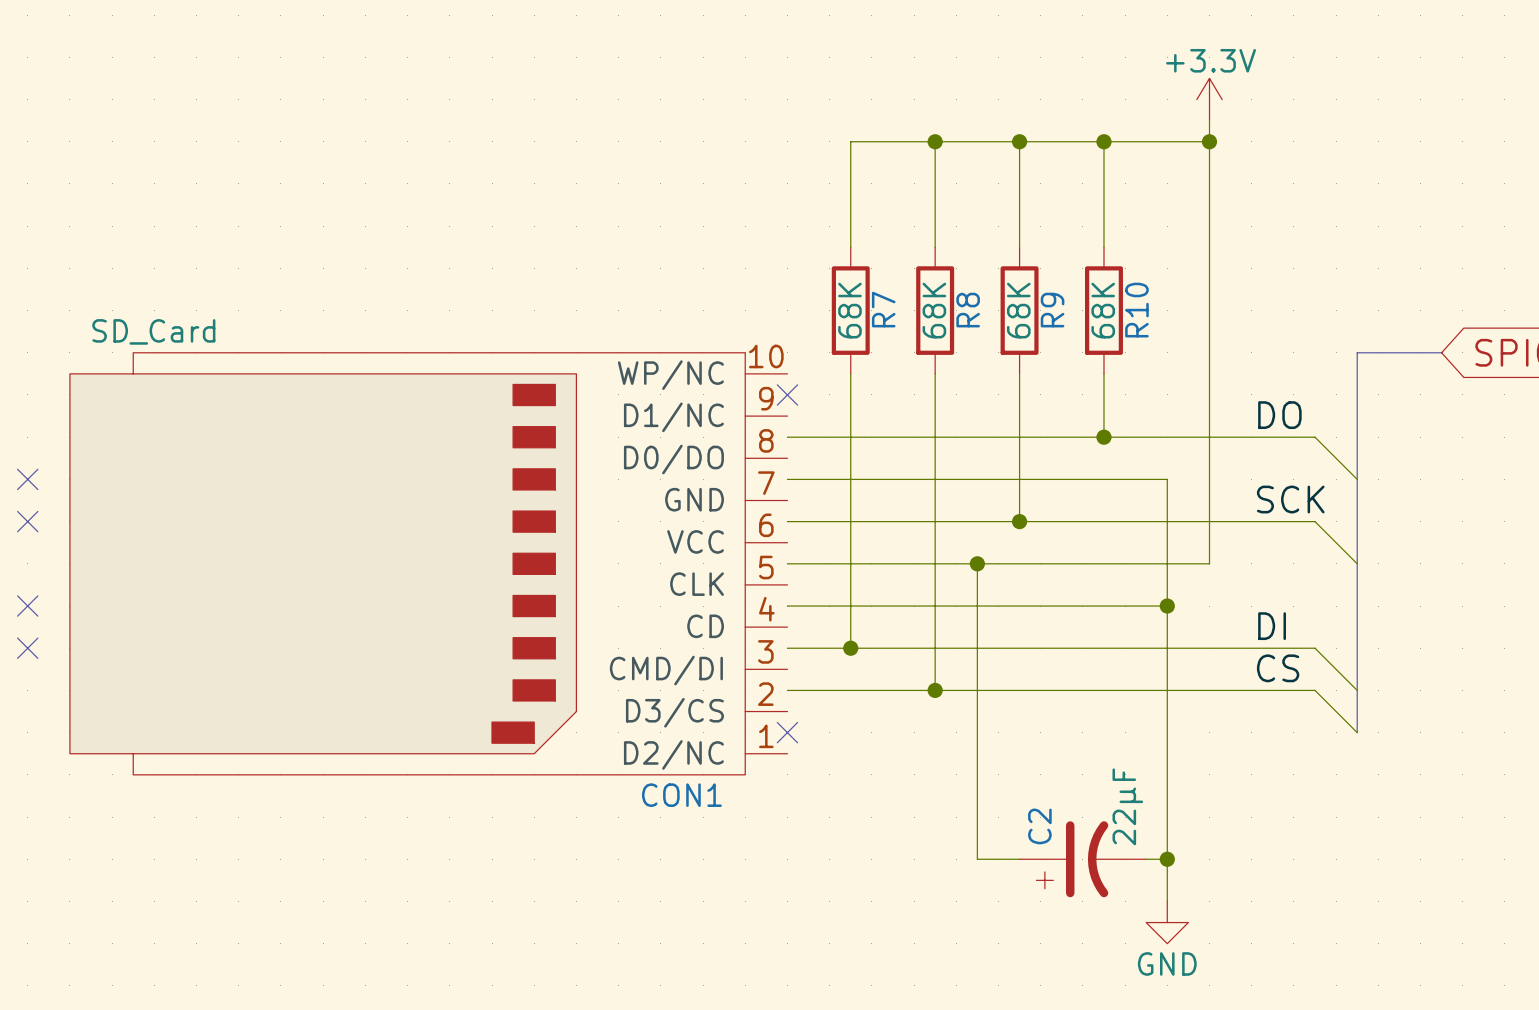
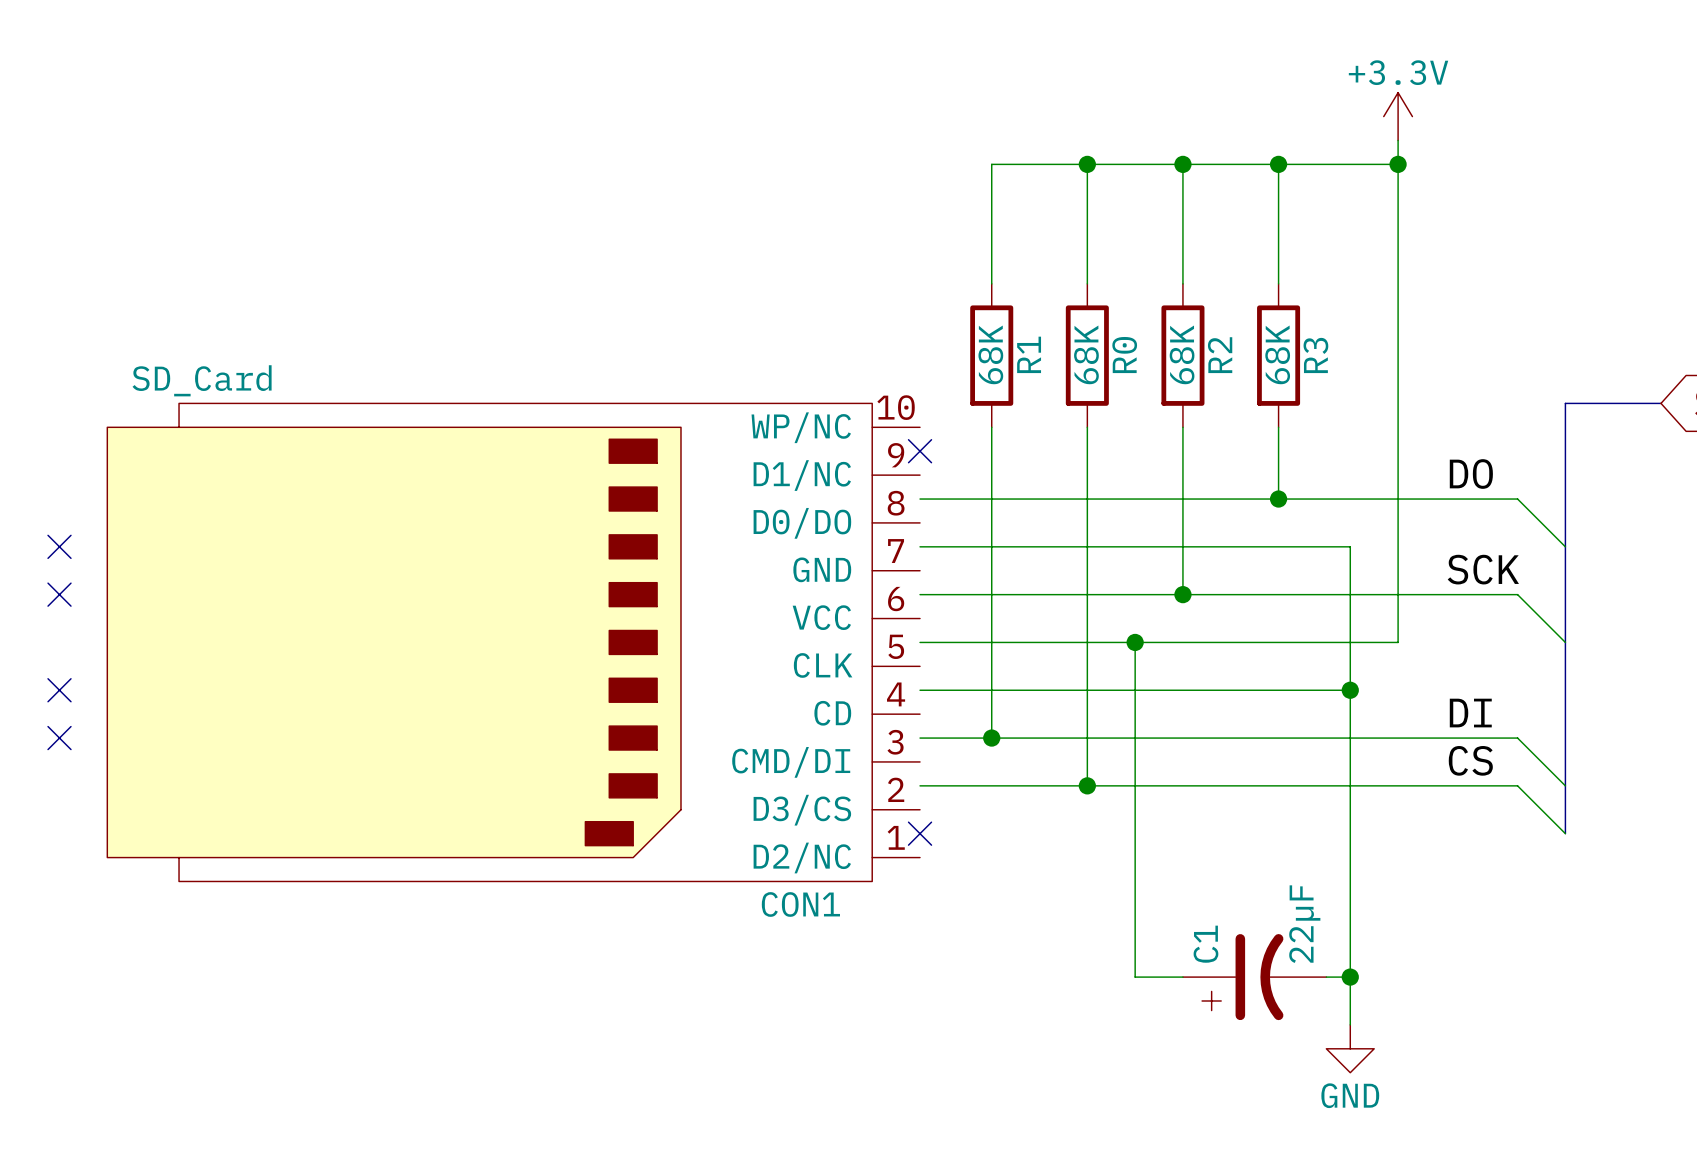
R7 name: R7 (883, 309) -> R1 (1029, 354)
R8 name: R8 (968, 310) -> R0 (1124, 355)
R9 name: R9 (1052, 310) -> R2 (1220, 355)
R10 name: R10 (1136, 310) -> R3 (1315, 355)
C2 name: C2 (1039, 826) -> C1 (1205, 944)

